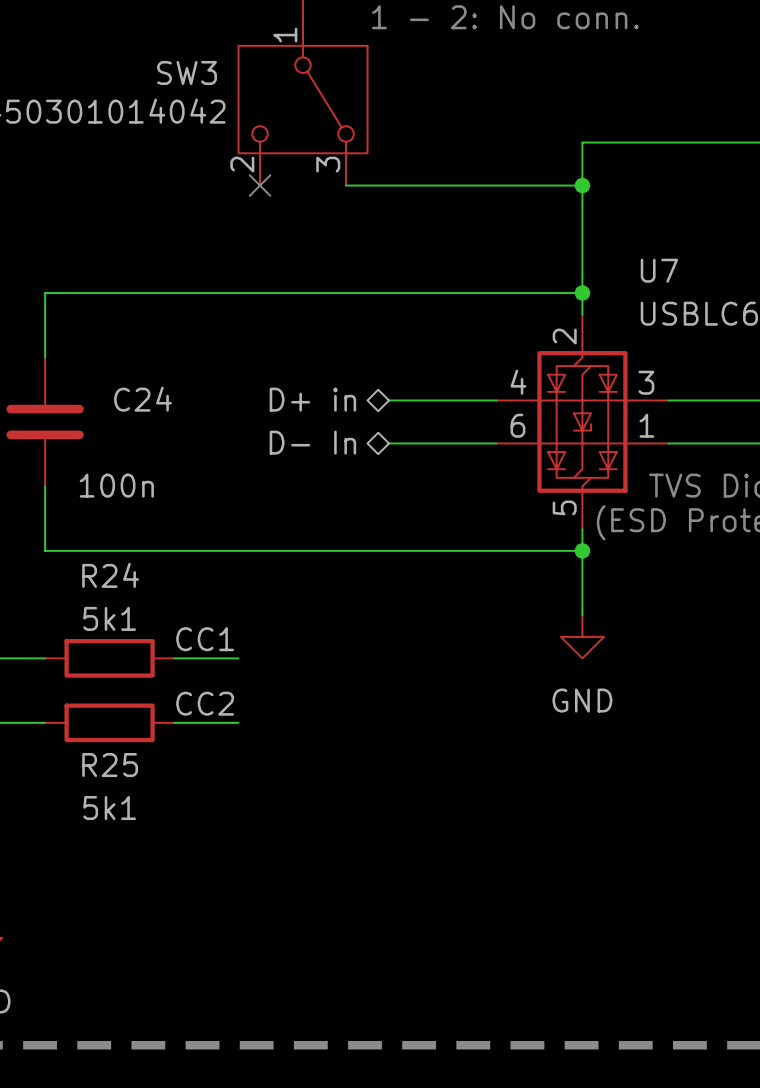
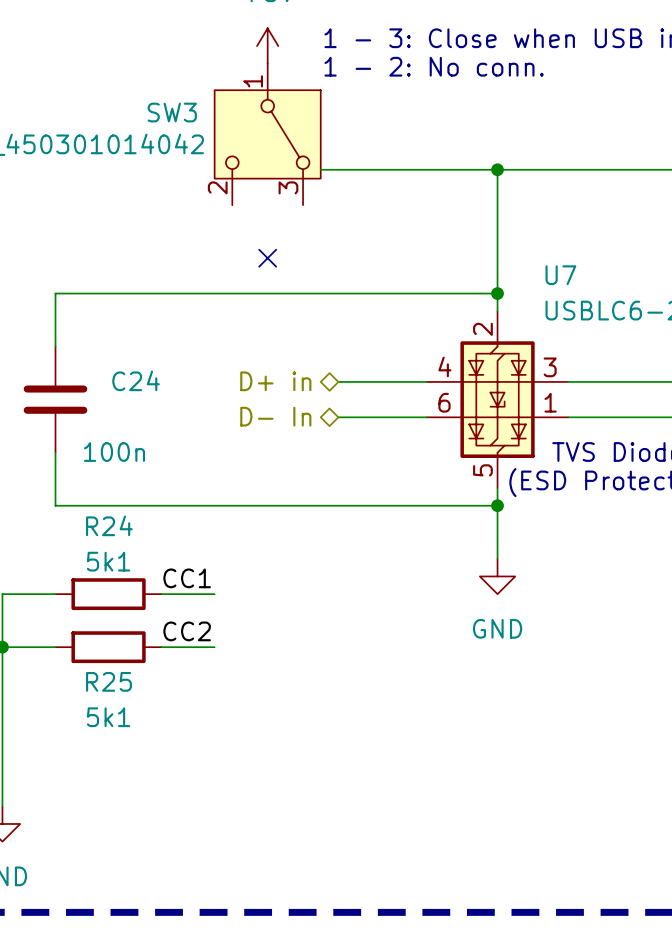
wire: none -> (320, 169) (497, 169)
no-connect mark position: (260, 185) -> (267, 258)
wire: (346, 185) (582, 185) -> none
junction position: (582, 185) -> (497, 169)

